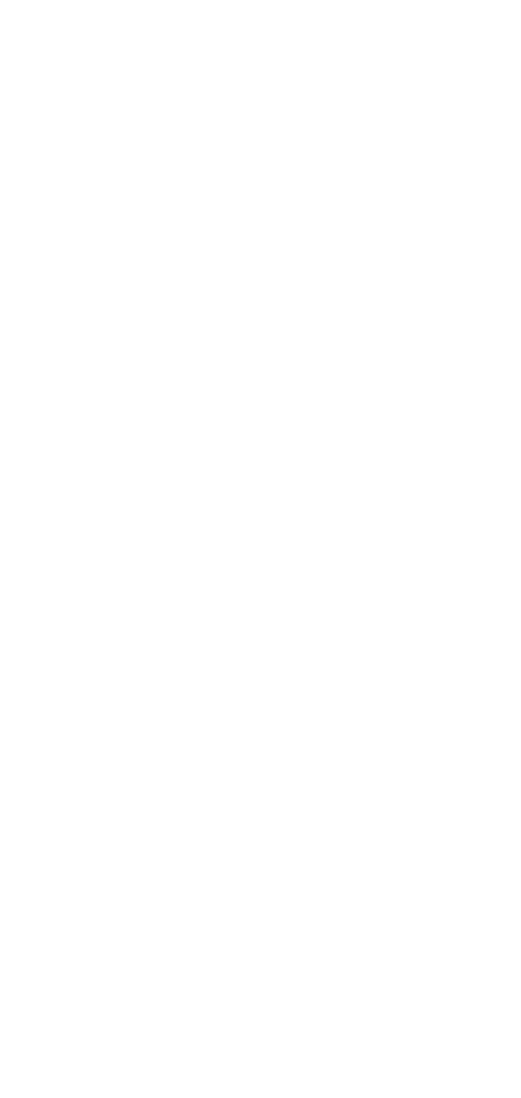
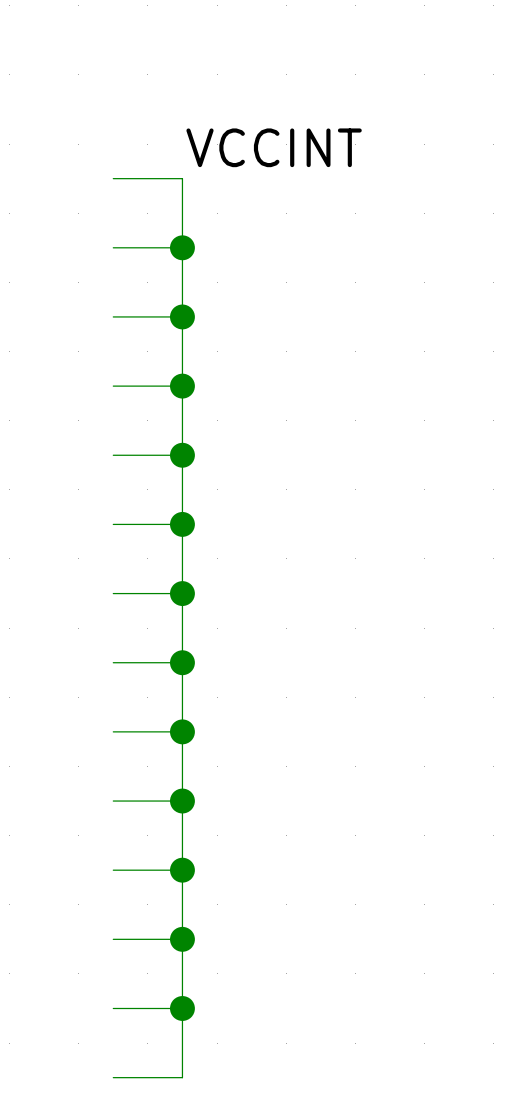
label: none -> VCCINT (274, 147)
wire: none -> (113, 178) (182, 178) (182, 1077) (113, 1077)
wire: none -> (113, 247) (182, 247)
junction: none -> (182, 247)
wire: none -> (113, 316) (182, 316)
junction: none -> (182, 316)
wire: none -> (113, 386) (182, 386)
junction: none -> (182, 386)
wire: none -> (113, 455) (182, 455)
junction: none -> (182, 455)
wire: none -> (113, 524) (182, 524)
junction: none -> (182, 524)
wire: none -> (113, 593) (182, 593)
junction: none -> (182, 593)
wire: none -> (113, 662) (182, 662)
junction: none -> (182, 662)
wire: none -> (113, 731) (182, 731)
junction: none -> (182, 731)
wire: none -> (113, 801) (182, 801)
junction: none -> (182, 801)
wire: none -> (113, 870) (182, 870)
junction: none -> (182, 870)
wire: none -> (113, 939) (182, 939)
junction: none -> (182, 939)
wire: none -> (113, 1008) (182, 1008)
junction: none -> (182, 1008)

